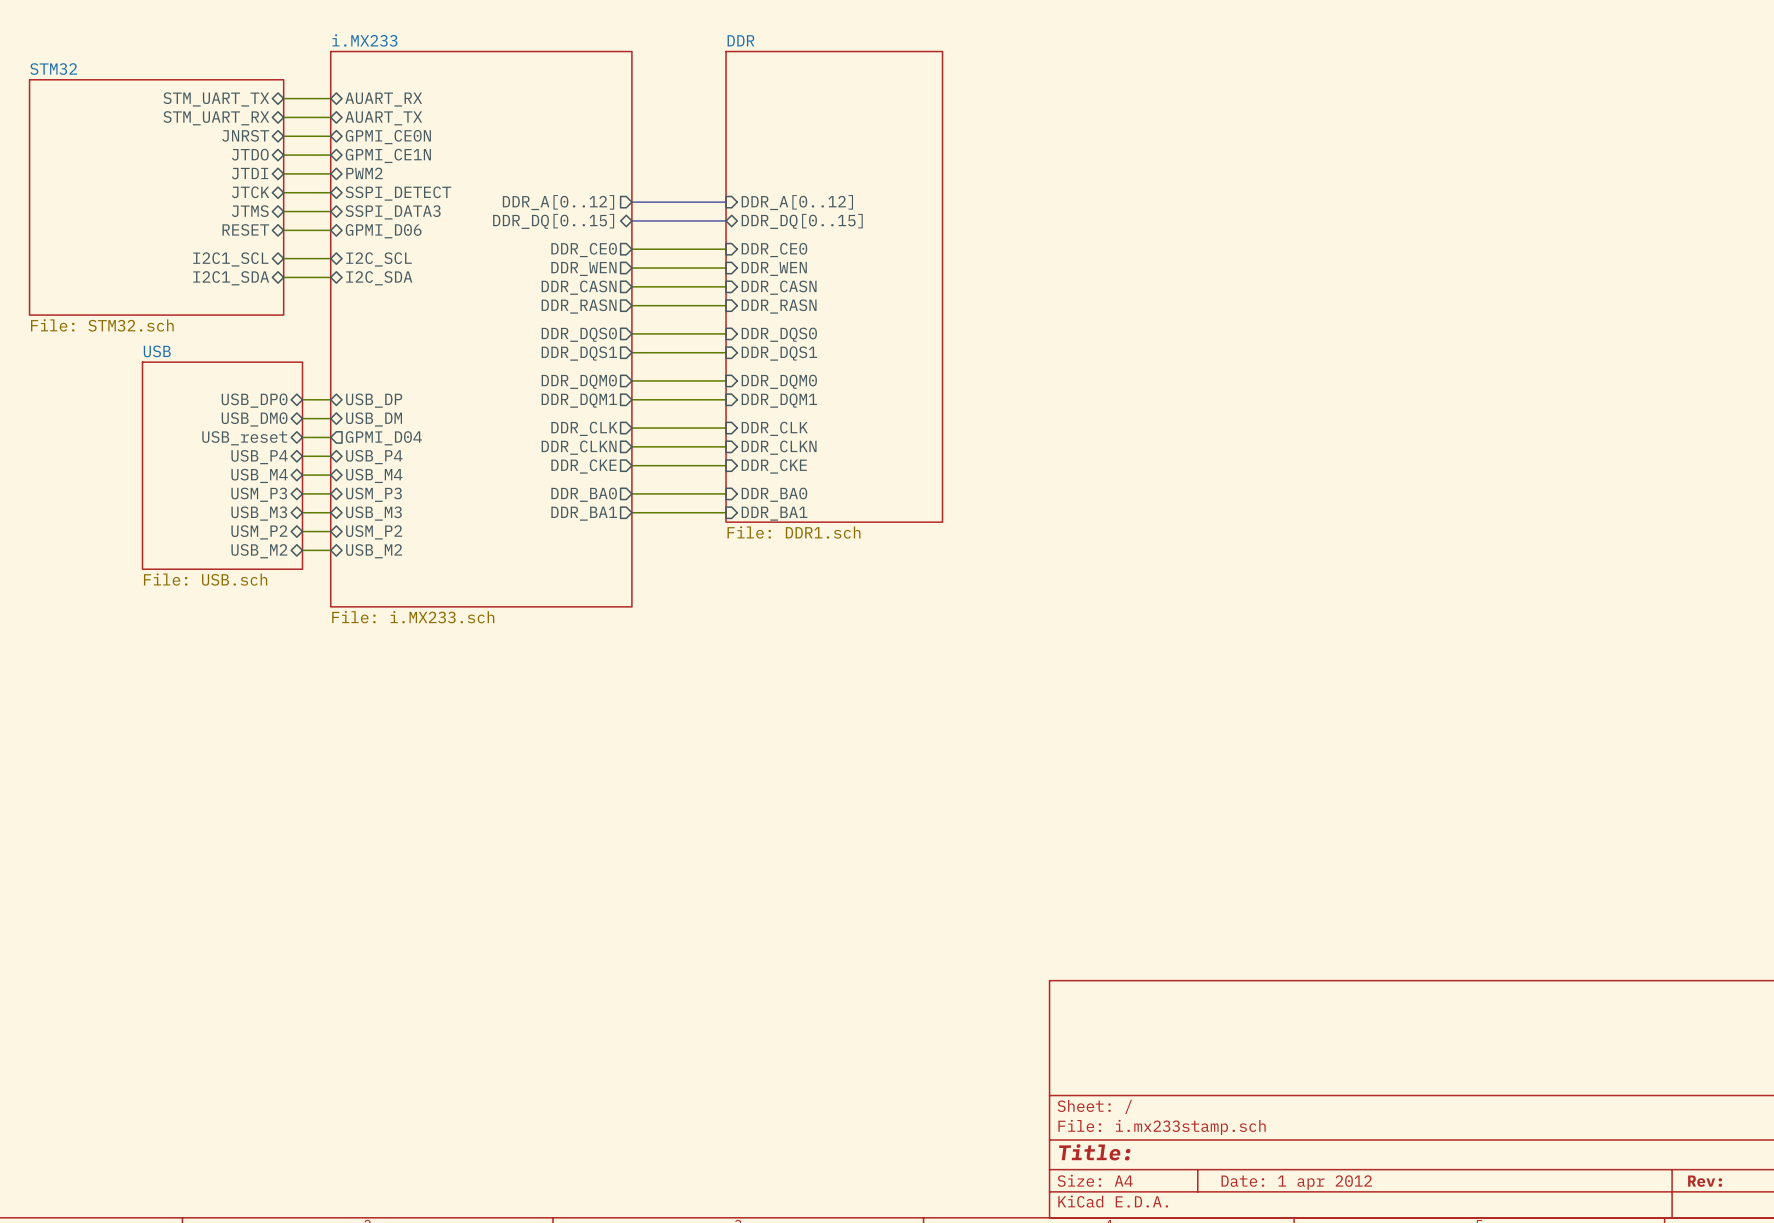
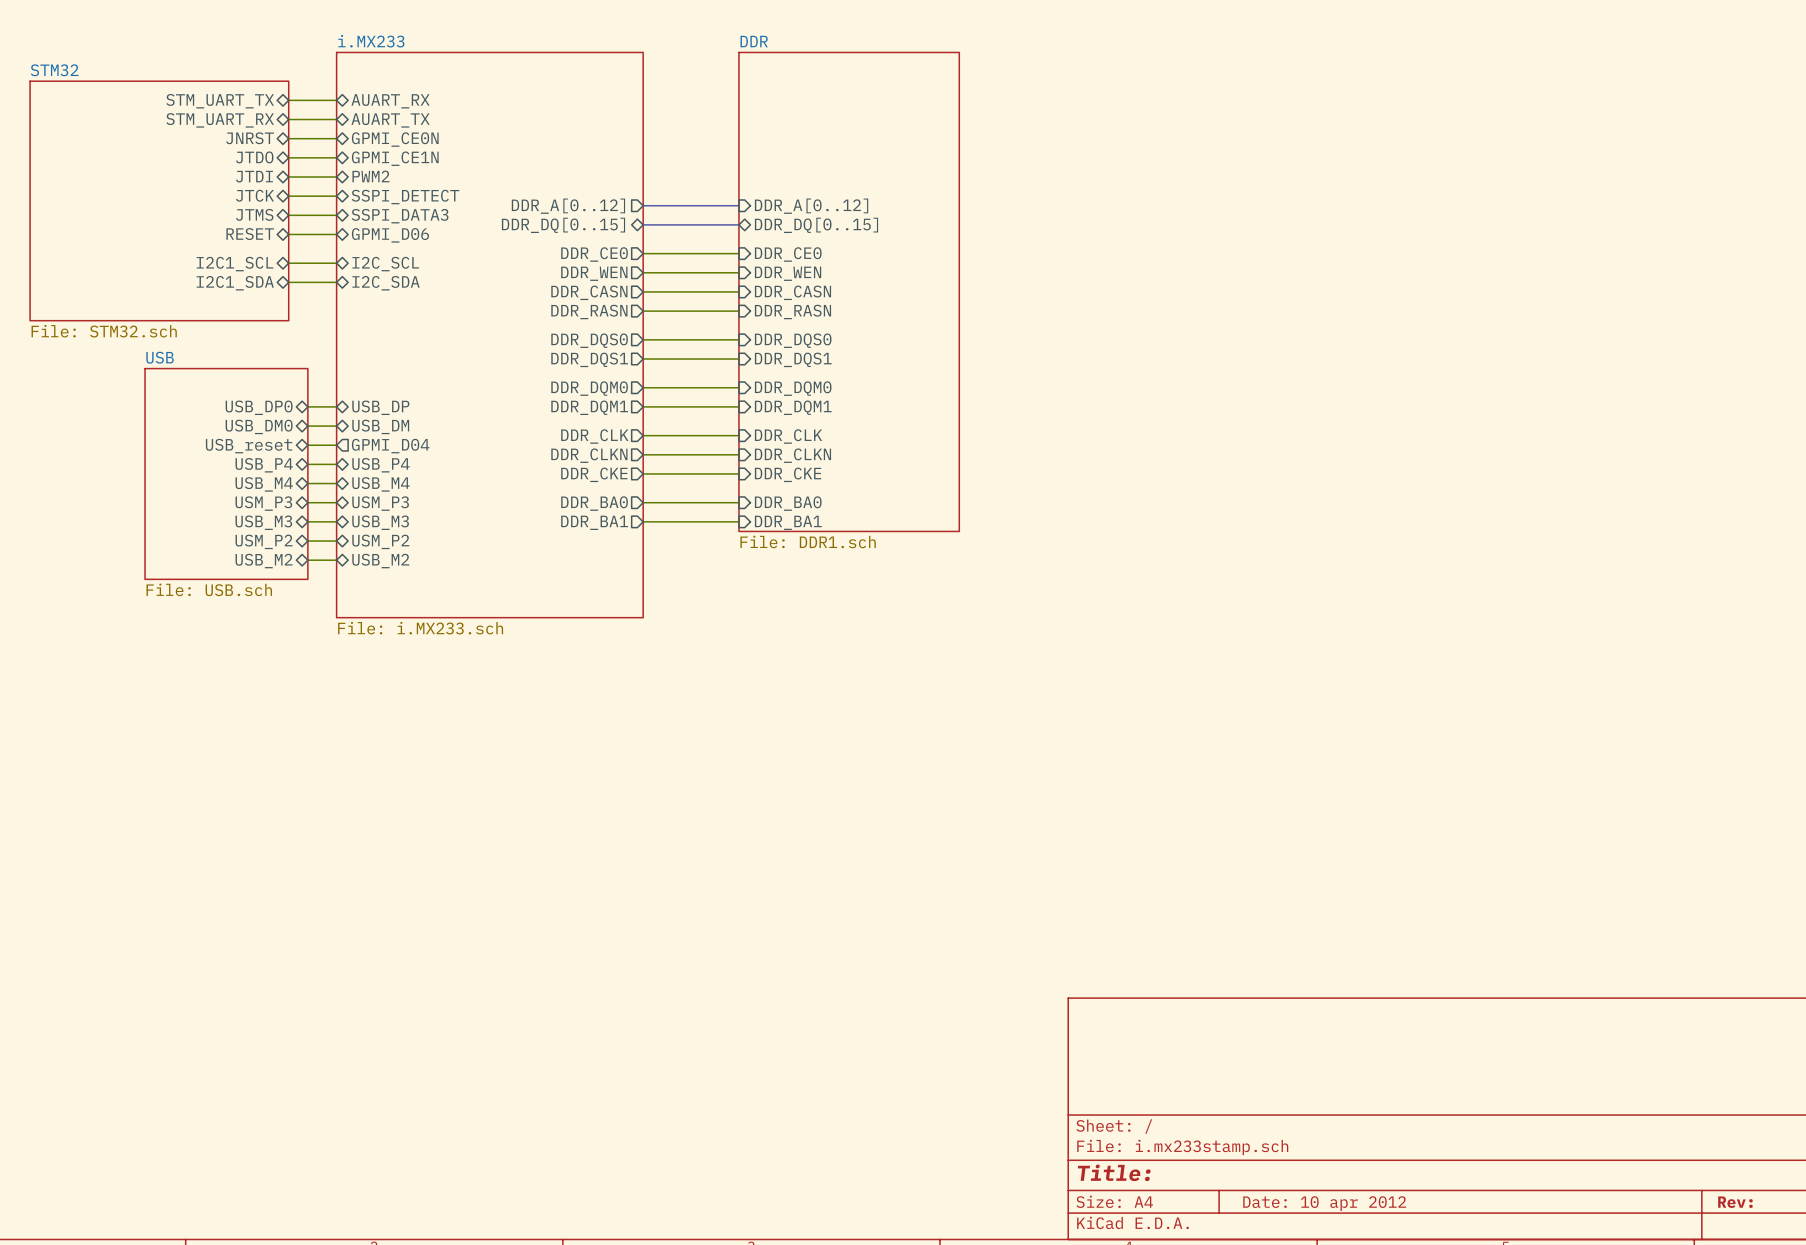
title block: Date: 1 apr 2012 (1296, 1182) -> Date: 10 apr 2012 (1324, 1203)

